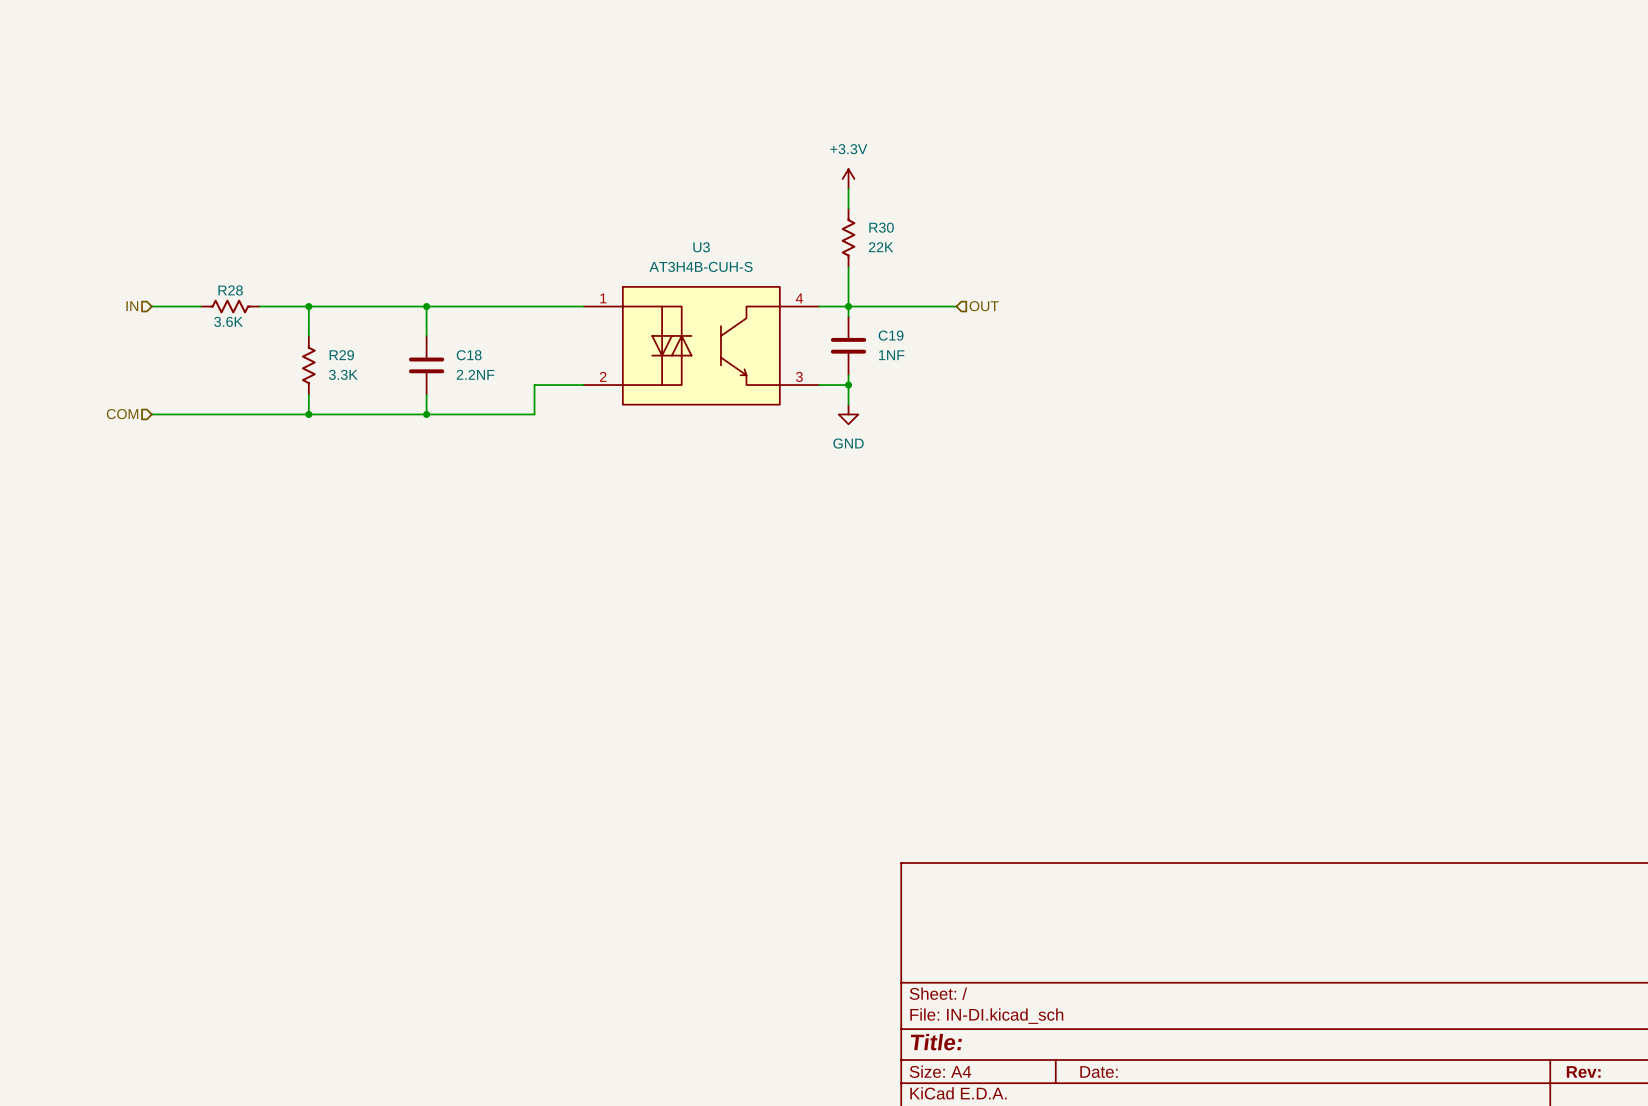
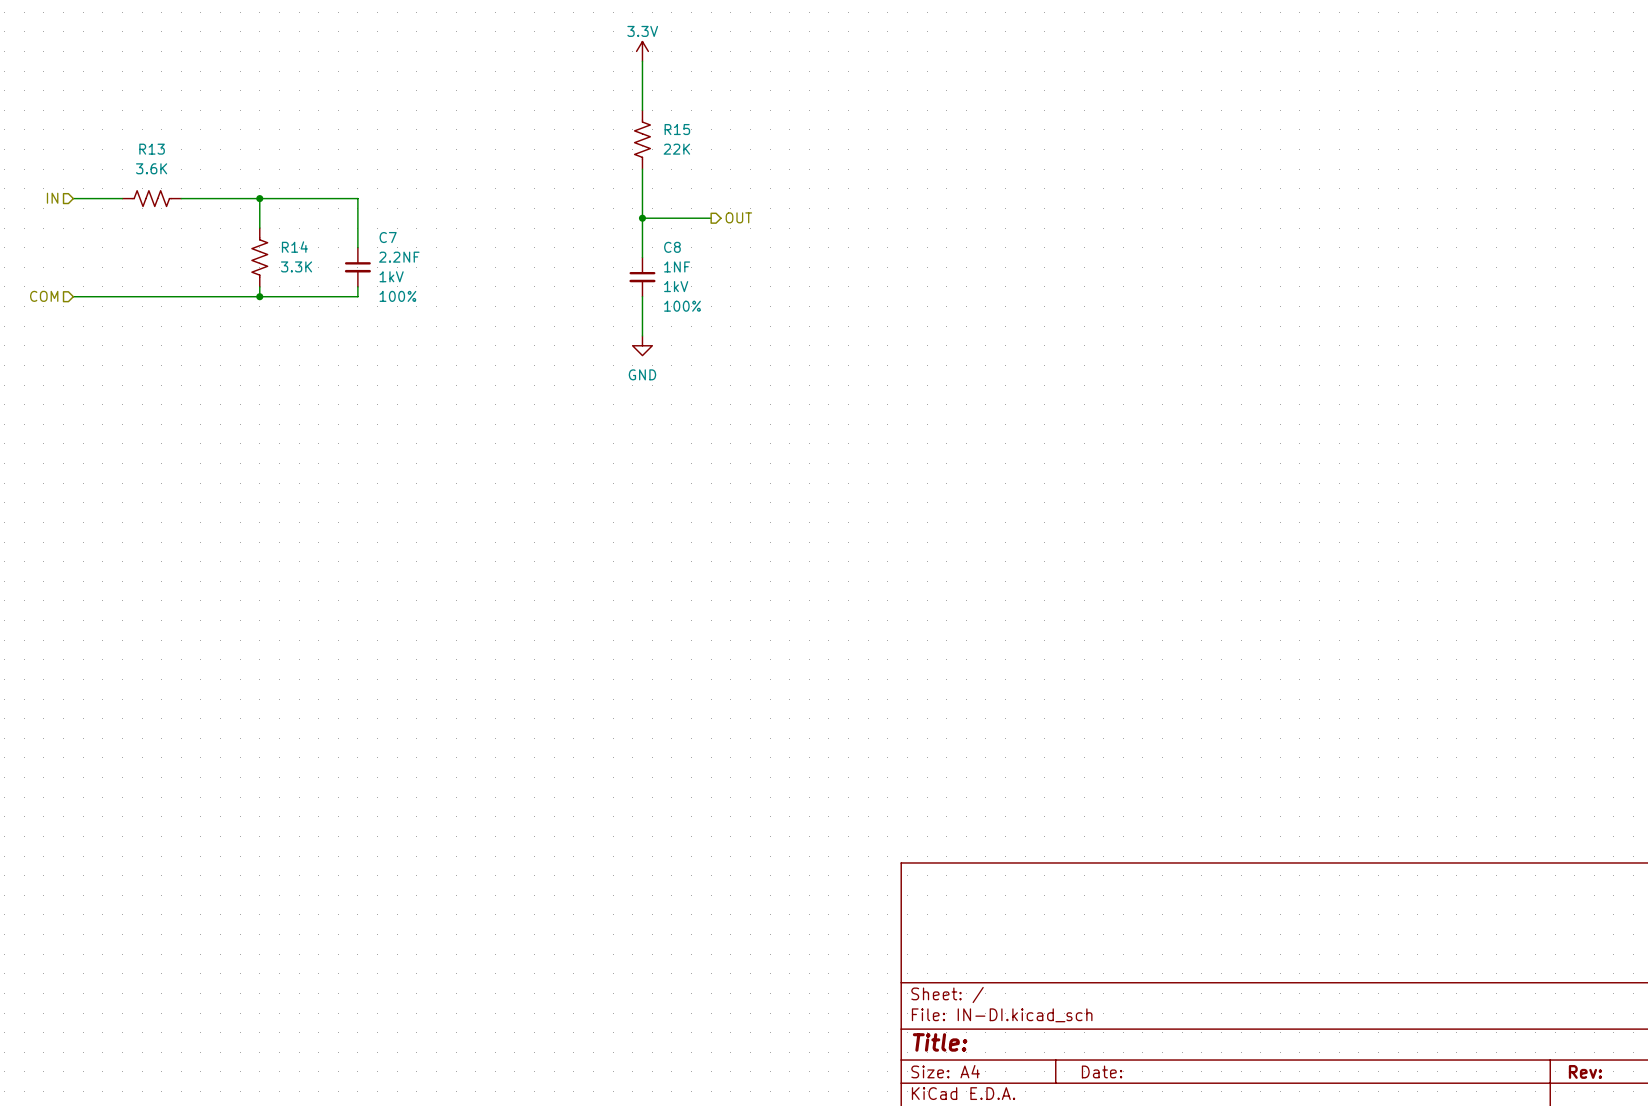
power symbol: none -> 3.3V (642, 51)
wire: none -> (642, 61) (642, 110)
R15: none -> 22K (642, 139)
wire: none -> (642, 169) (642, 257)
power symbol: +3.3V (848, 178) -> none
wire: (848, 188) (848, 208) -> none
R13: none -> 3.6K (151, 198)
wire: none -> (181, 198) (357, 198) (357, 247)
junction: none -> (259, 198)
hierarchical label: none -> OUT (738, 217)
wire: none -> (642, 218) (711, 218)
junction: none -> (642, 218)
R30: 22K (848, 237) -> none
R14: none -> 3.3K (259, 257)
C7: none -> 2.2NF (357, 267)
wire: (848, 267) (848, 316) -> none
C8: none -> 1NF (642, 277)
wire: none -> (259, 286) (259, 296)
wire: none -> (357, 286) (357, 296) (73, 296)
junction: none -> (259, 296)
hierarchical label position: IN (132, 306) -> IN (52, 198)
wire: (151, 306) (200, 306) -> (73, 198) (122, 198)
R28: 3.6K (230, 306) -> none
wire: (259, 306) (583, 306) -> none
wire: (308, 306) (308, 335) -> (259, 198) (259, 228)
junction: (308, 306) -> none
wire: (426, 306) (426, 335) -> none
junction: (426, 306) -> none
wire: (819, 306) (956, 306) -> none
junction: (848, 306) -> none
hierarchical label: OUT (984, 306) -> none
power symbol: none -> GND (642, 345)
U3: AT3H4B-CUH-S (701, 345) -> none
C19: 1NF (848, 345) -> none
R29: 3.3K (308, 365) -> none
C18: 2.2NF (426, 365) -> none
wire: (848, 375) (848, 404) -> none
wire: (583, 385) (534, 385) (534, 414) (151, 414) -> none
wire: (819, 385) (848, 385) -> none
junction: (848, 385) -> none
wire: (308, 394) (308, 414) -> none
wire: (426, 394) (426, 414) -> none
hierarchical label position: COM (122, 414) -> COM (44, 296)
junction: (308, 414) -> none
junction: (426, 414) -> none
power symbol: GND (848, 414) -> none

